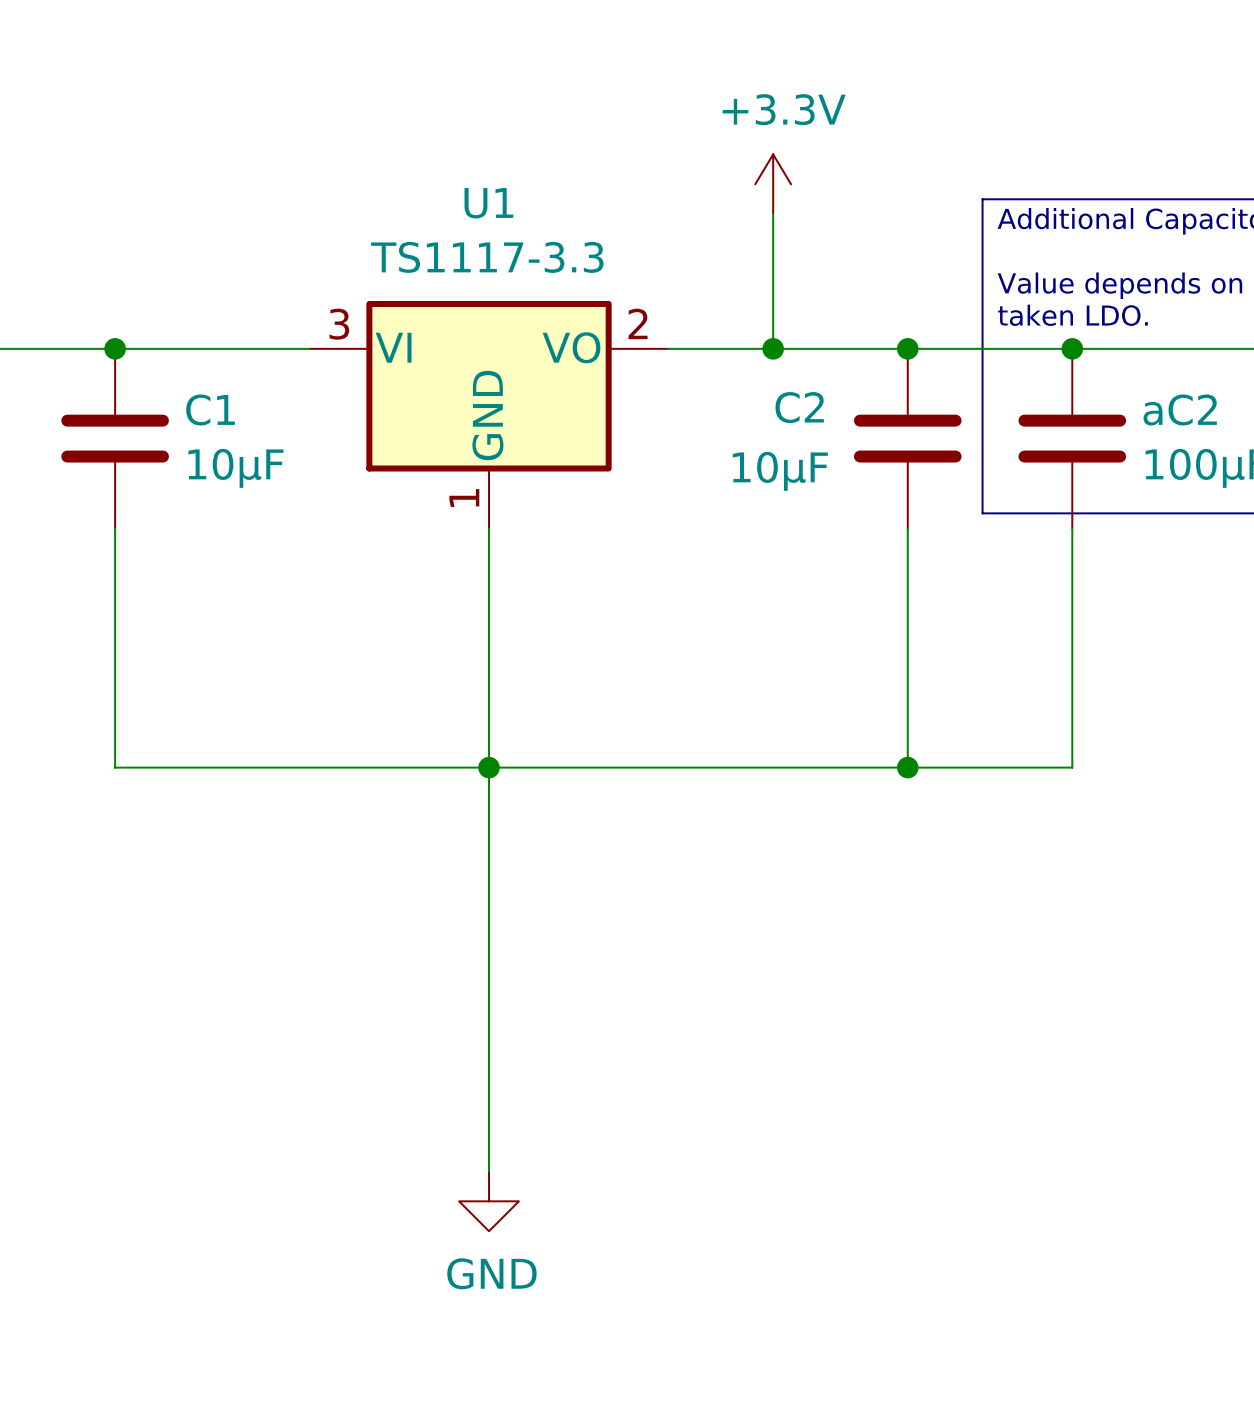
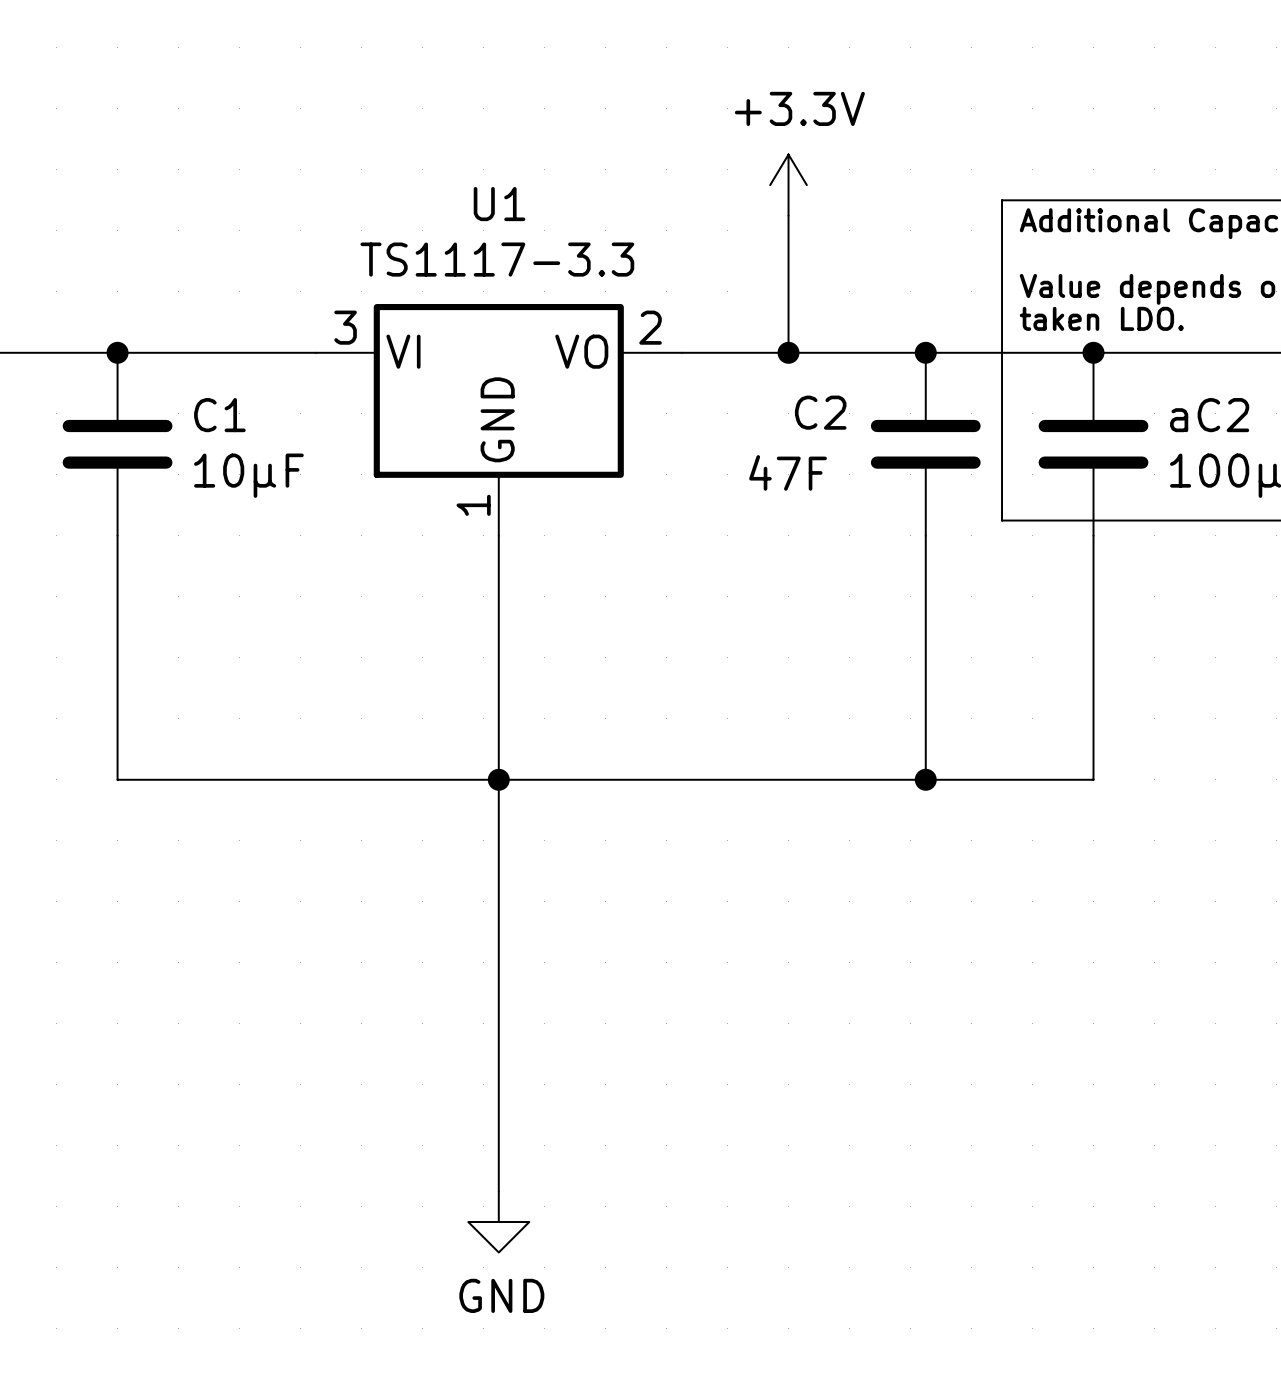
C2 value: 10µF (780, 471) -> 47F (788, 472)

